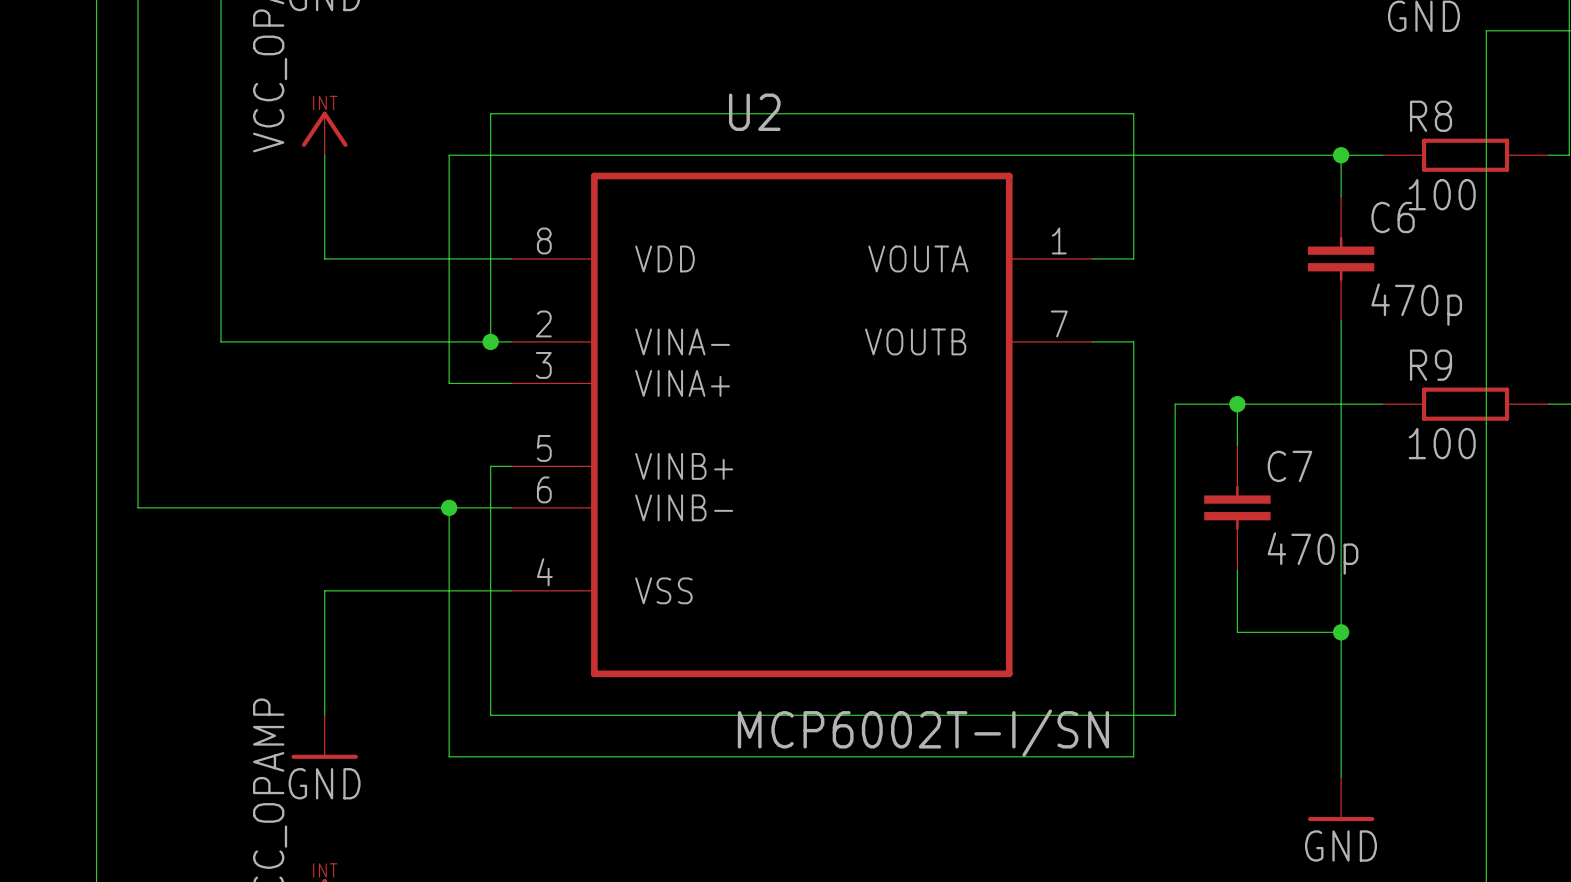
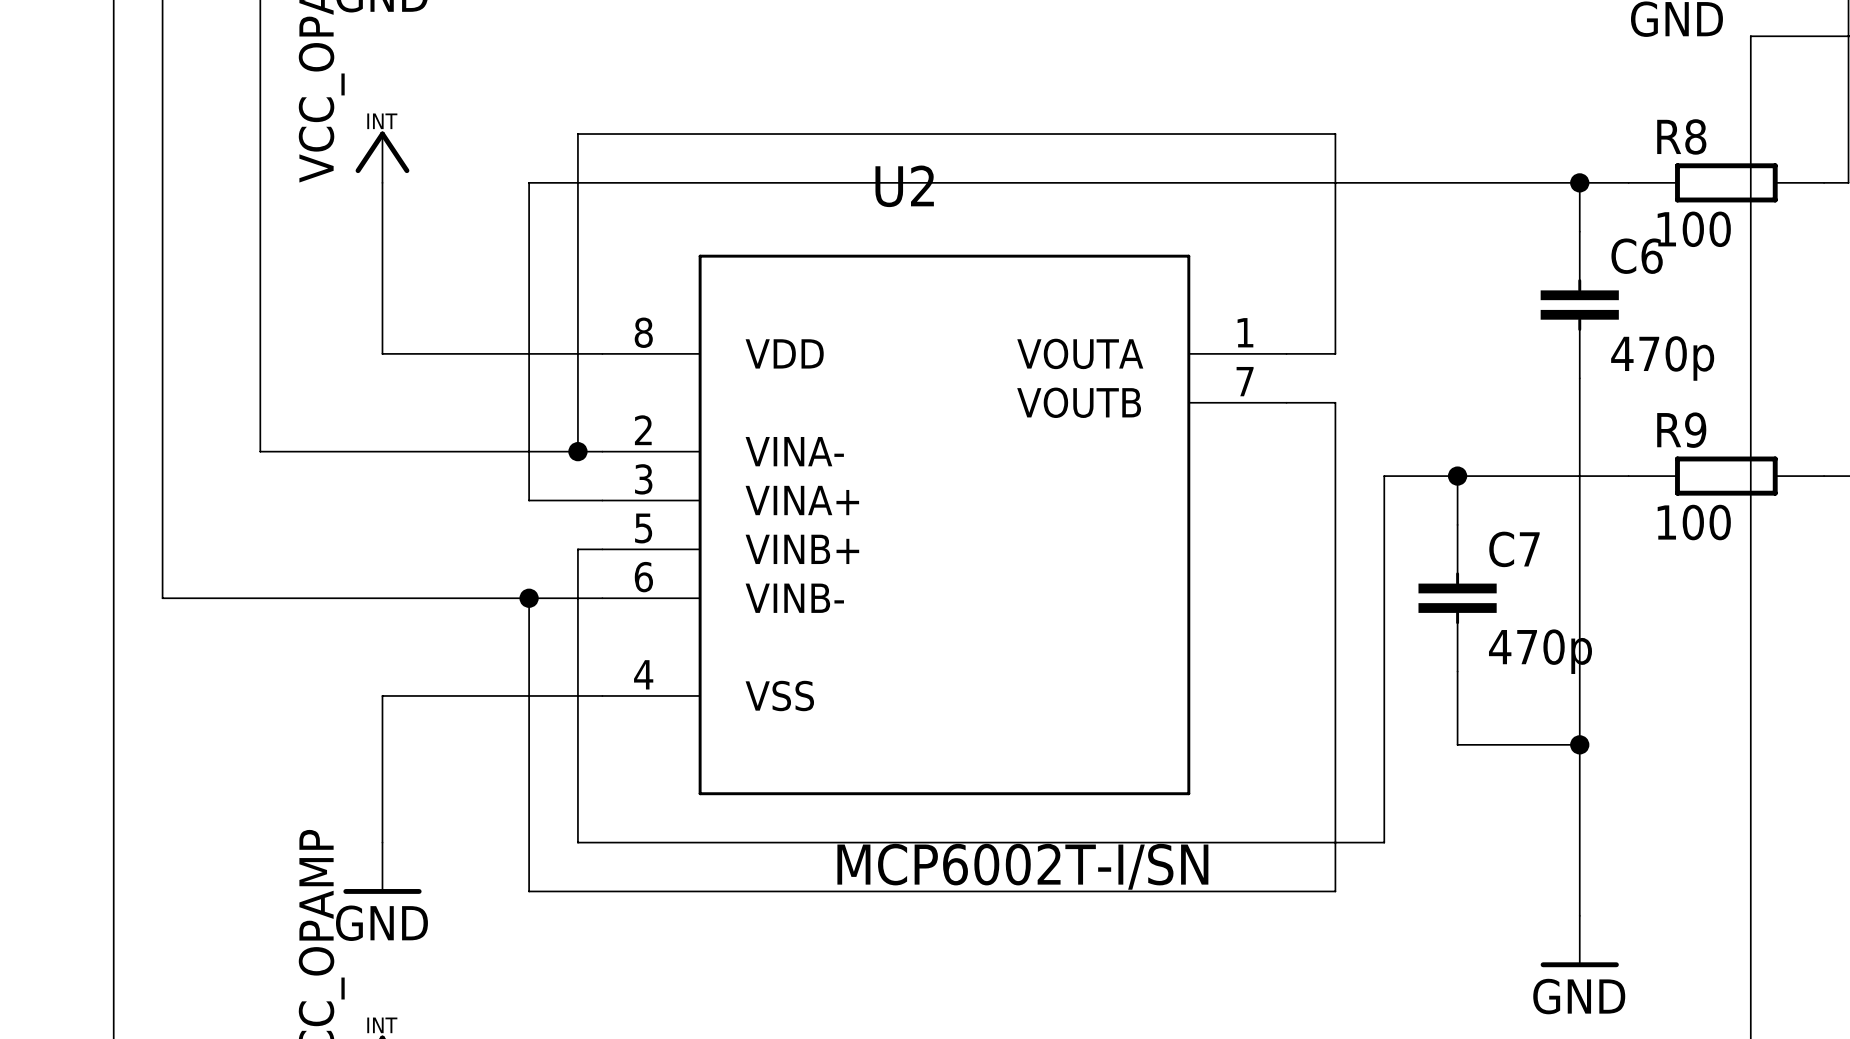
U2 symbol: [511, 172, 1093, 678] -> [602, 254, 1287, 796]
wire: (324, 258) (511, 258) -> (382, 305) (382, 353) (602, 353)
wire: (1092, 258) (1133, 258) -> (1286, 353) (1335, 353) (1335, 305)
wire: (220, 341) (511, 341) -> (260, 402) (260, 451) (529, 451) (529, 500) (602, 500)
wire: none -> (577, 402) (577, 451)
junction position: (490, 341) -> (577, 451)

